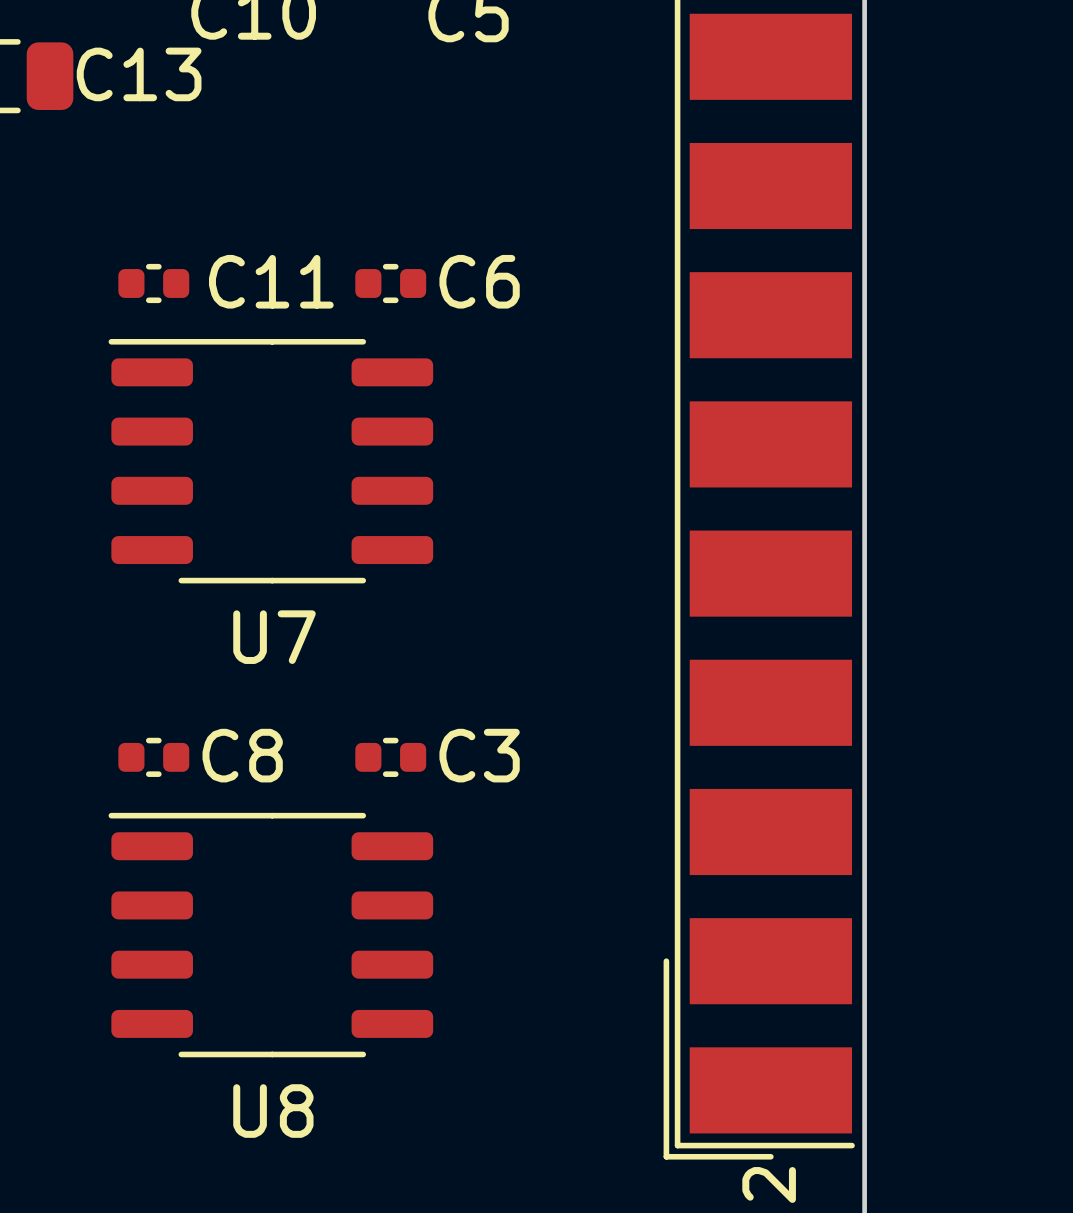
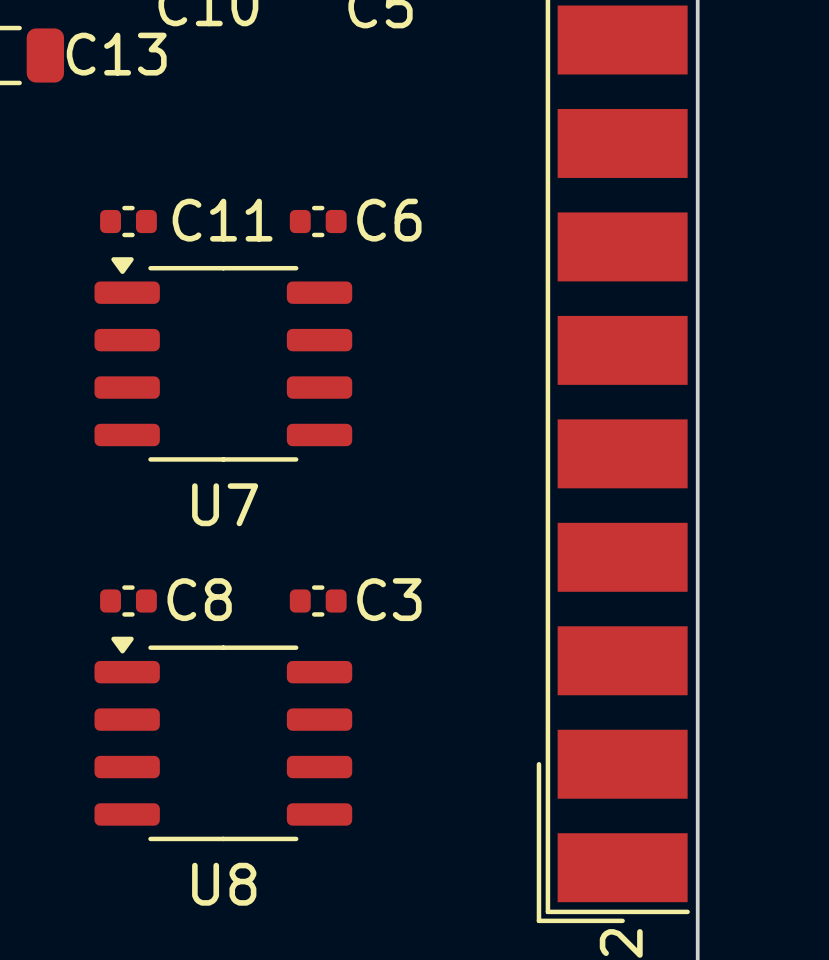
U7 footprint: [108, 338, 434, 584] -> [94, 257, 353, 462]
U8 footprint: [108, 812, 434, 1058] -> [94, 636, 353, 842]

